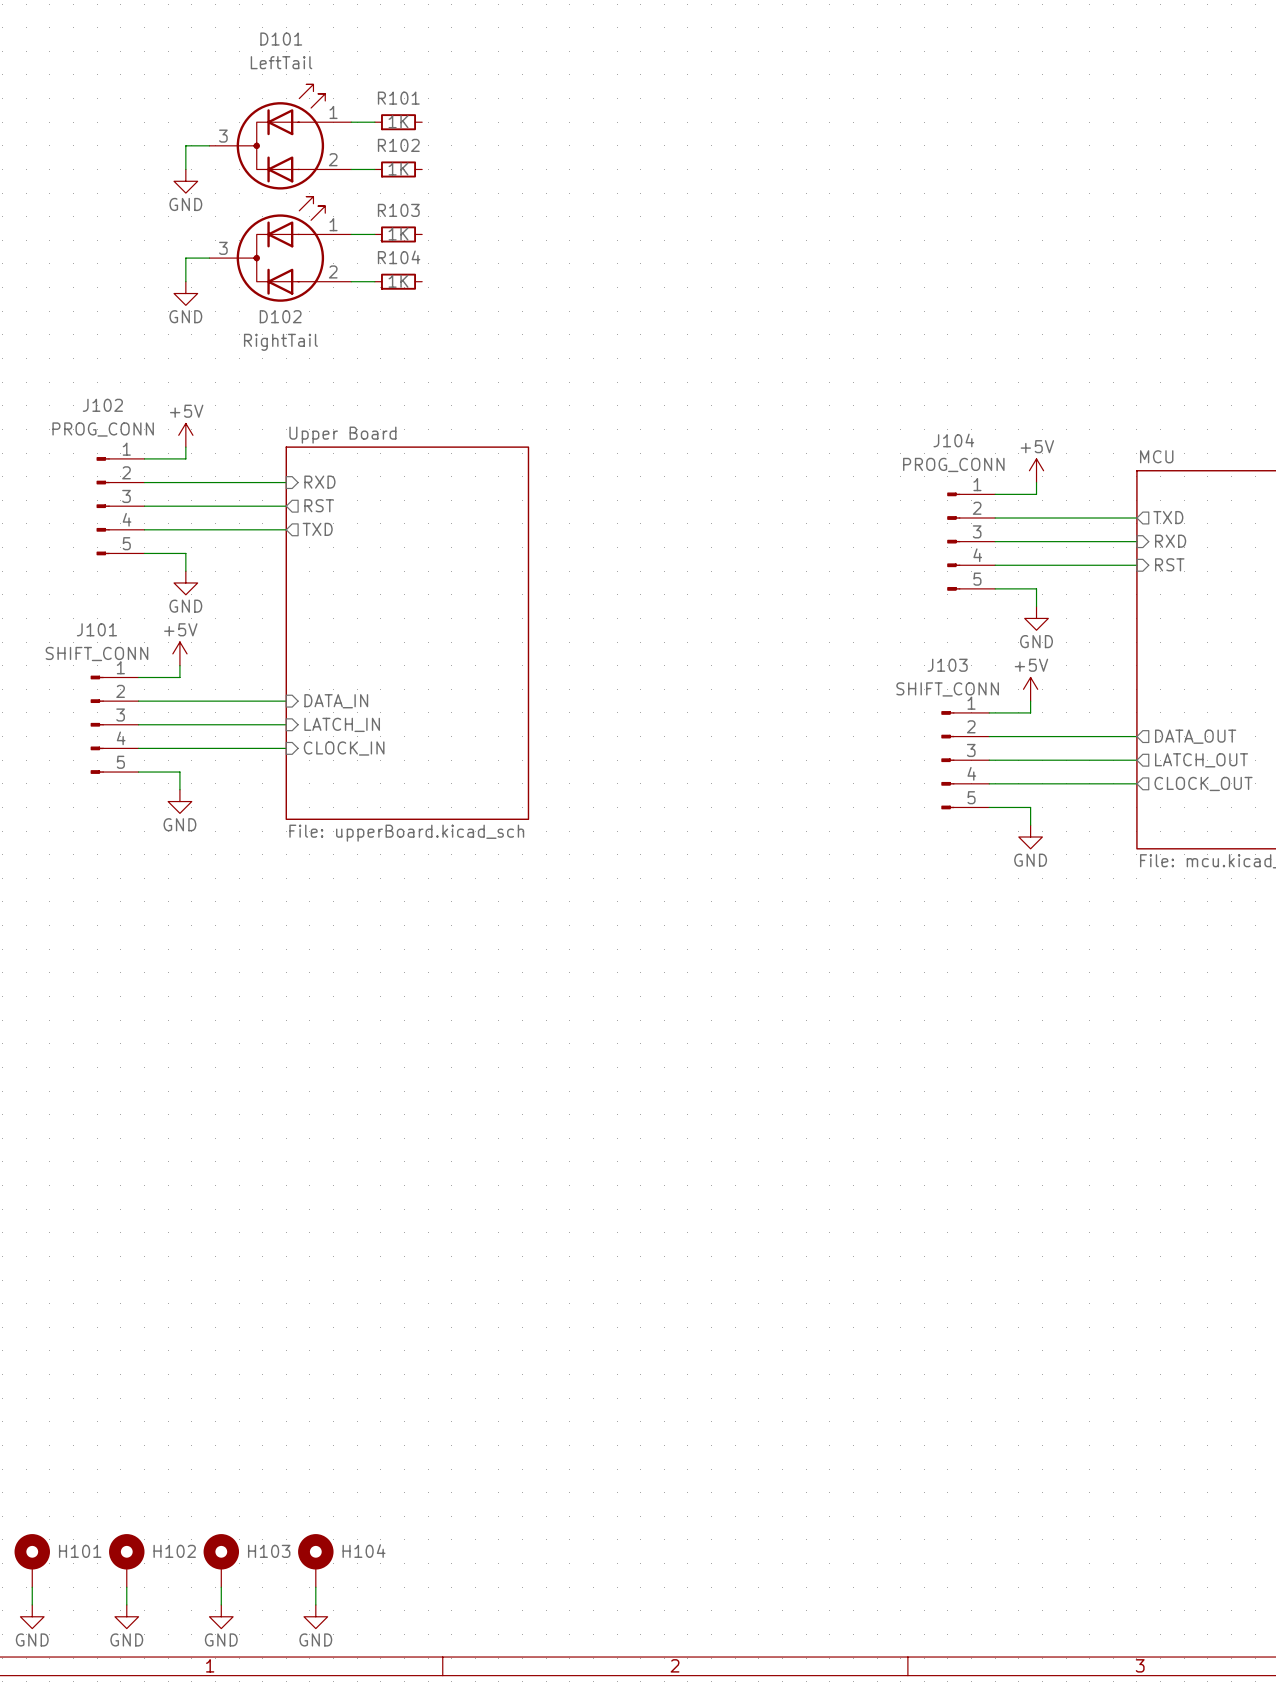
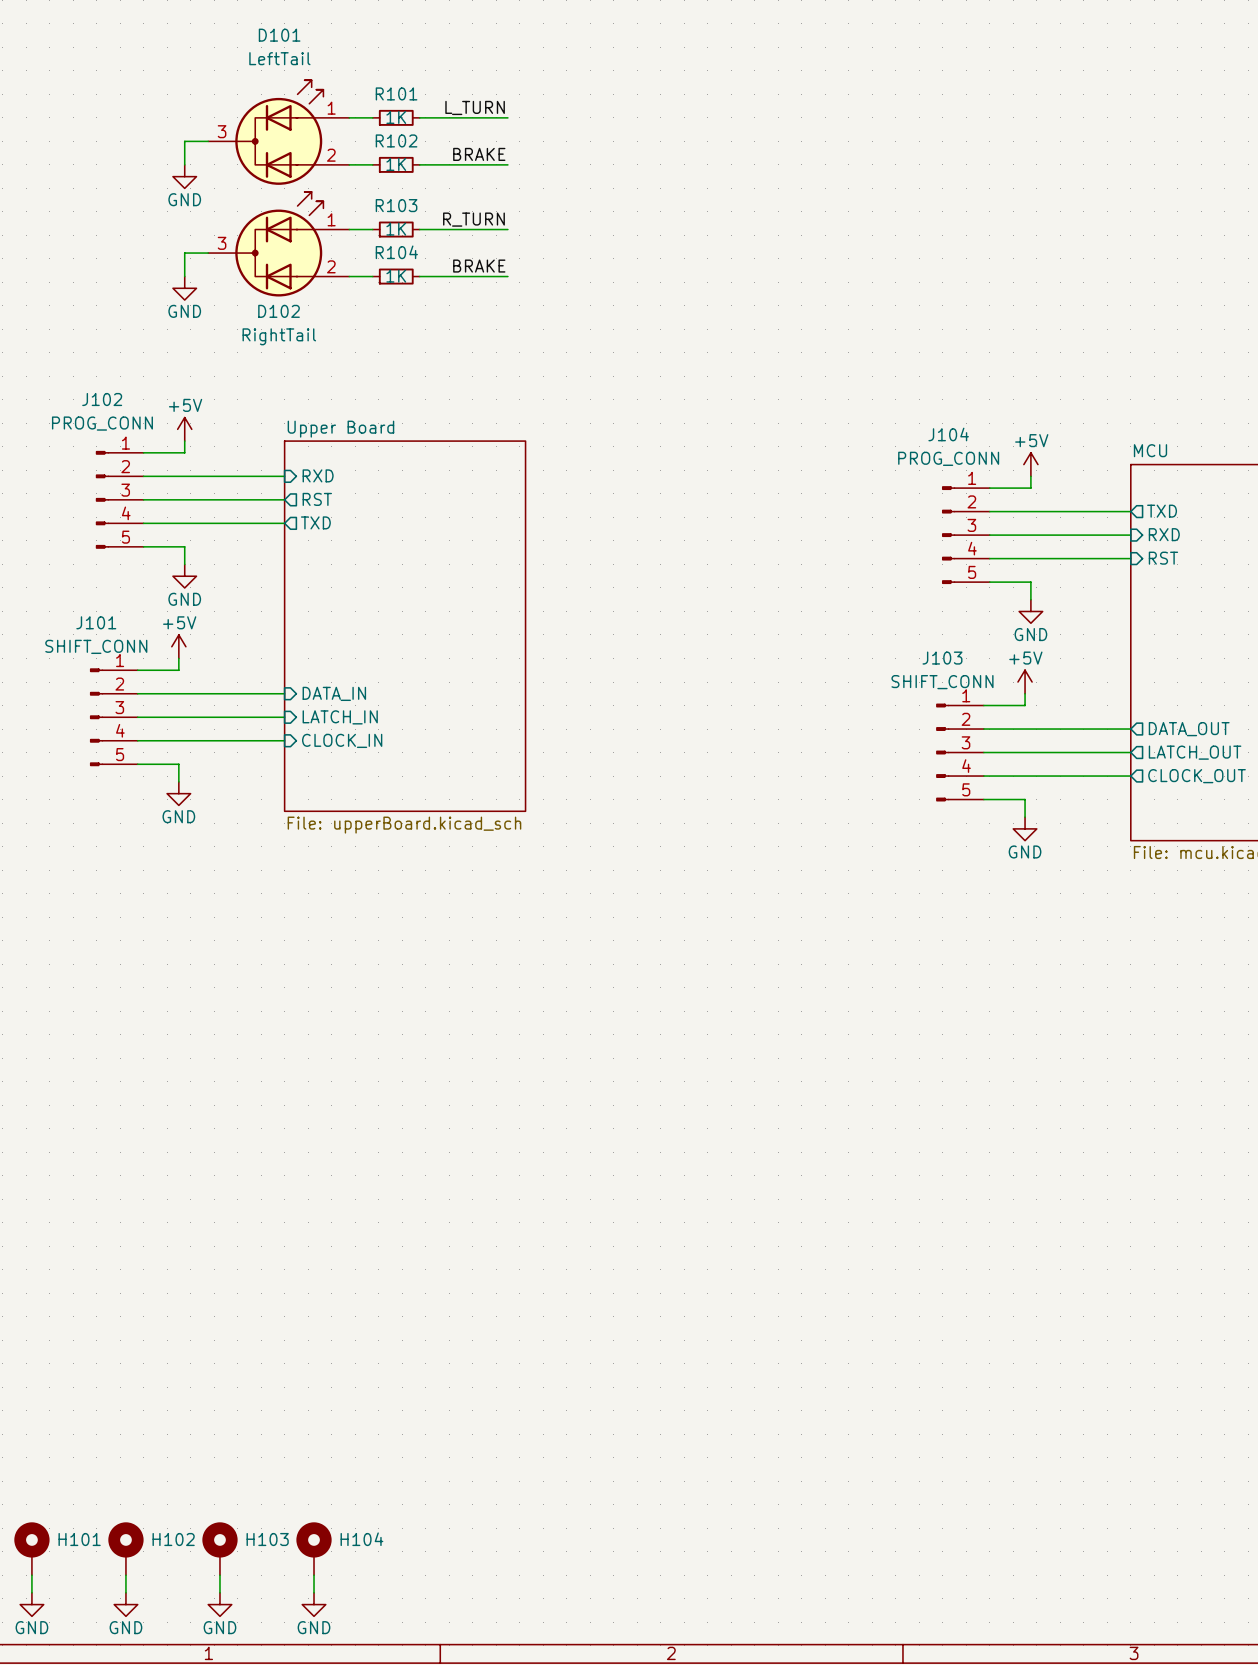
label: none -> L_TURN (475, 107)
wire: none -> (419, 117) (507, 117)
label: none -> BRAKE (479, 154)
wire: none -> (419, 164) (507, 164)
label: none -> R_TURN (473, 219)
wire: none -> (419, 229) (507, 229)
label: none -> BRAKE (479, 266)
wire: none -> (419, 276) (507, 276)

